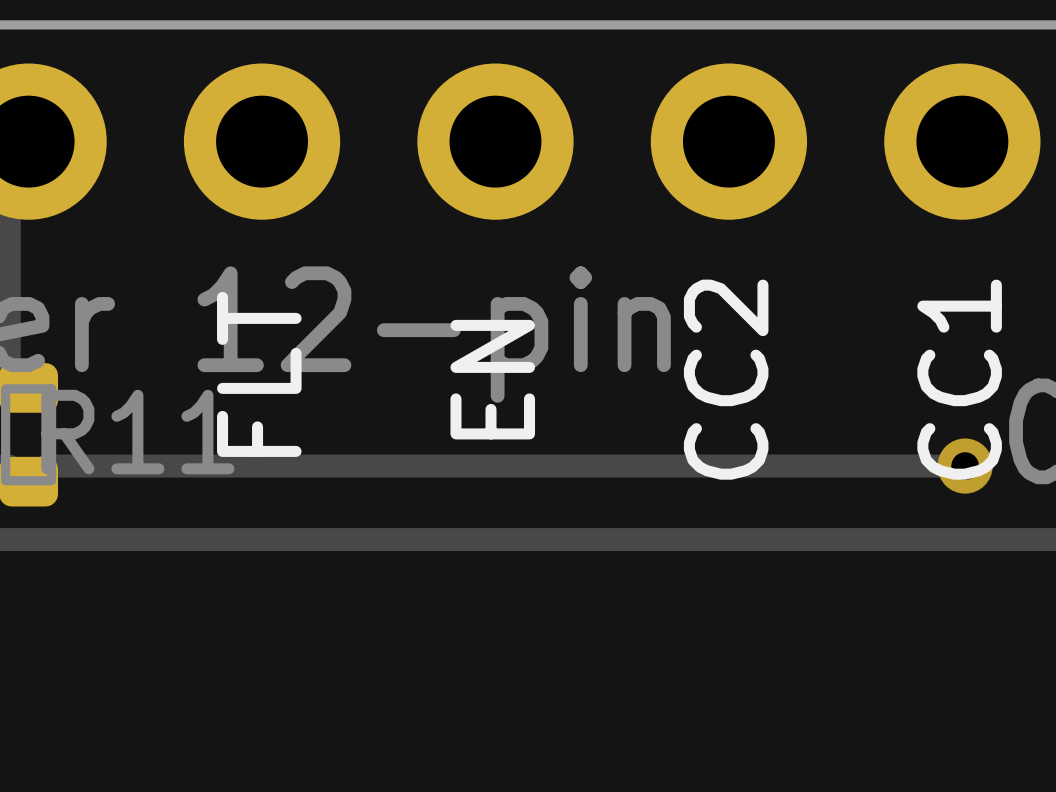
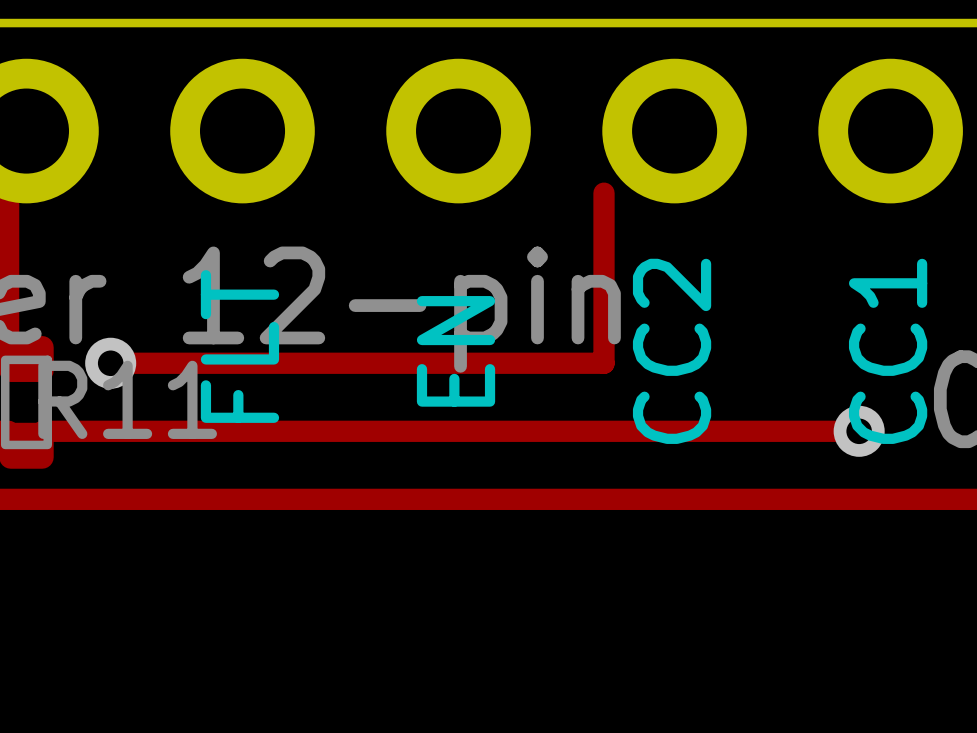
track: none -> (604, 193) (604, 363) (110, 363)
via: none -> (110, 363)
via position: (965, 466) -> (859, 431)

